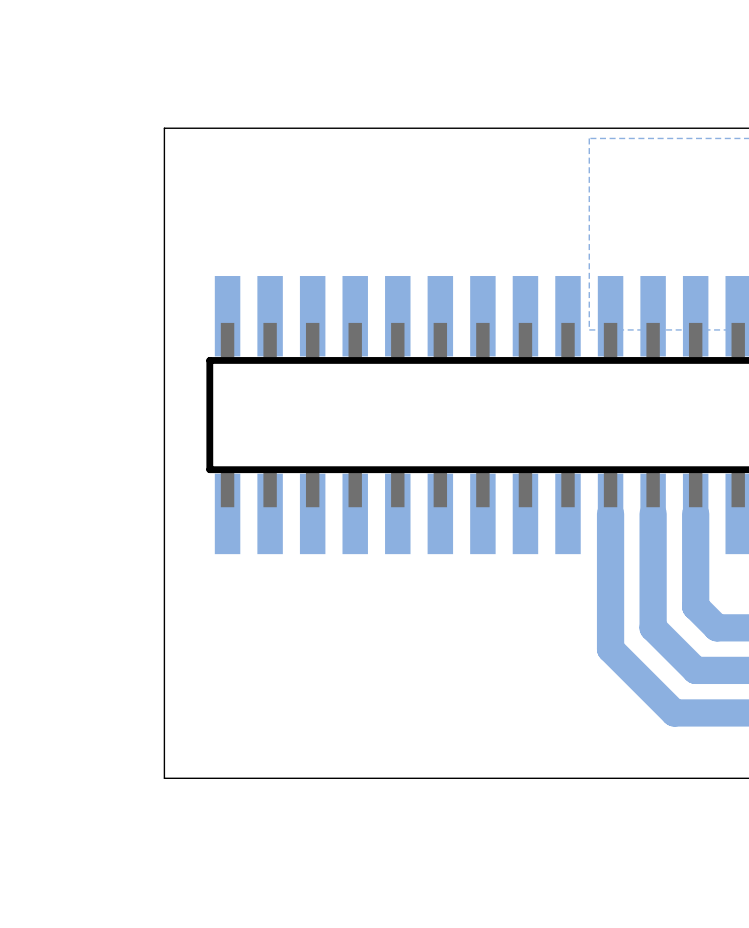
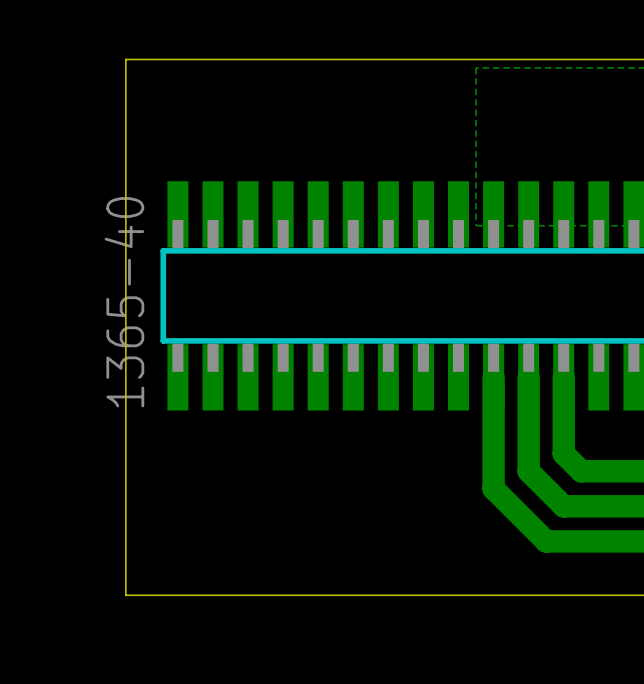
part value: none -> 1365-40 (124, 302)

